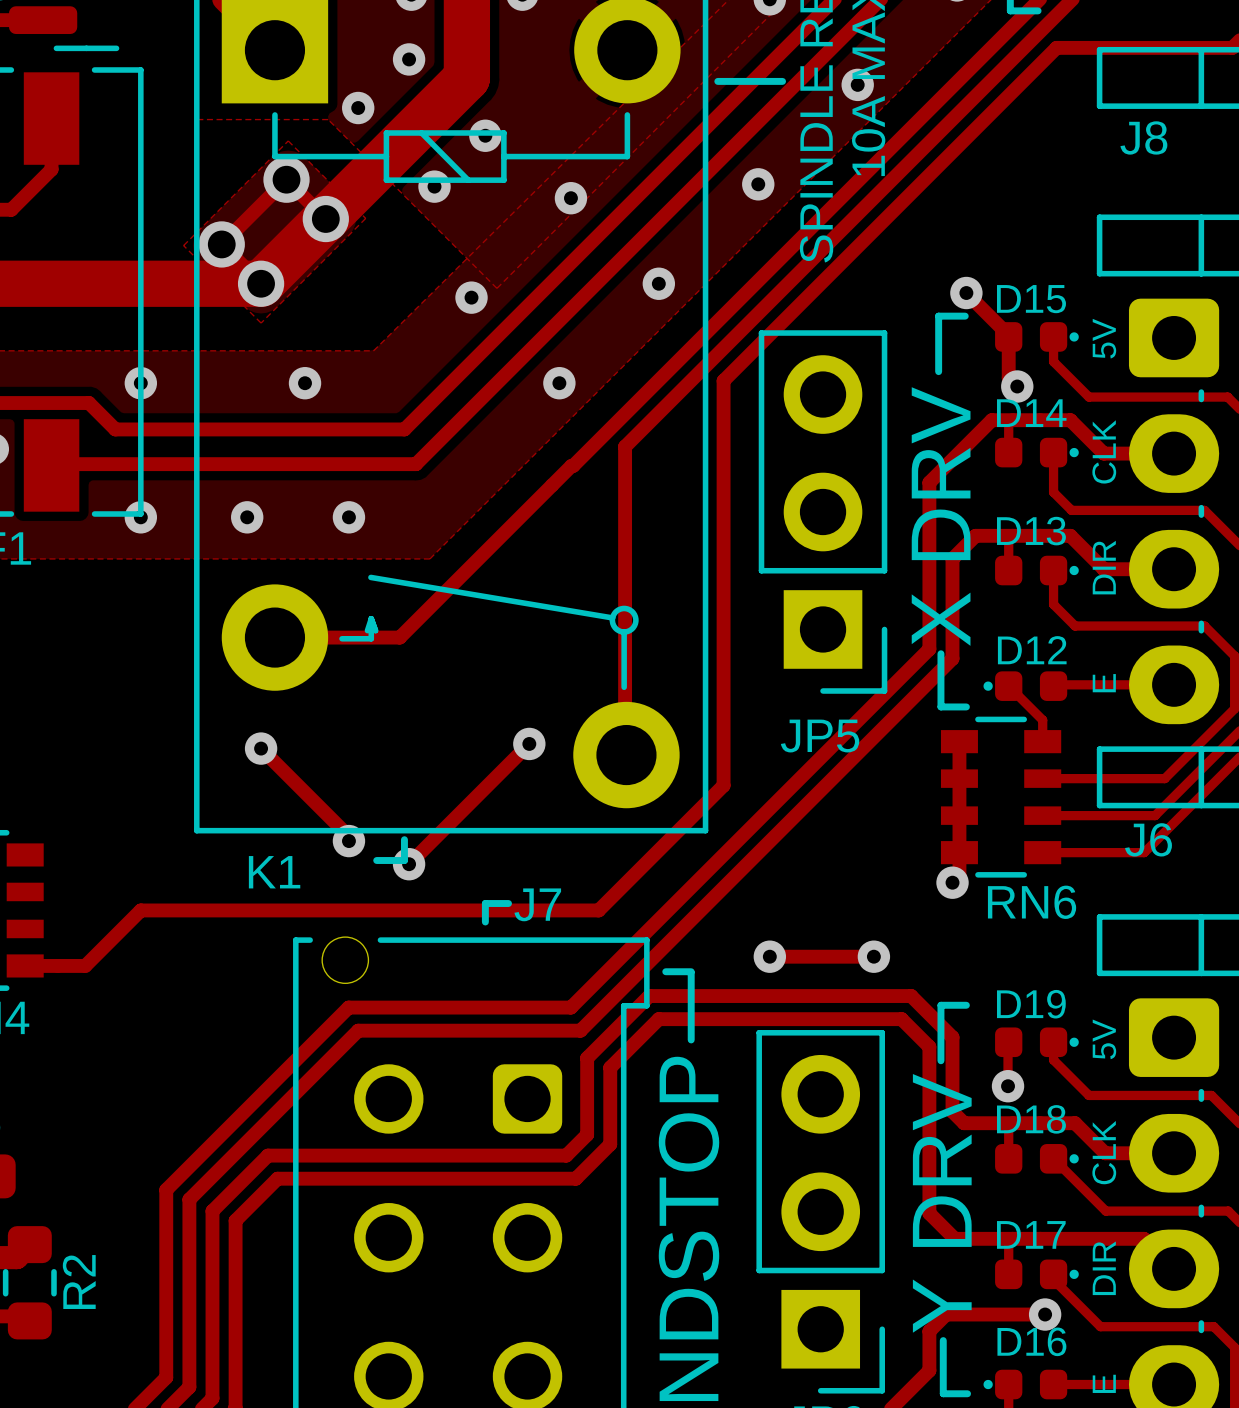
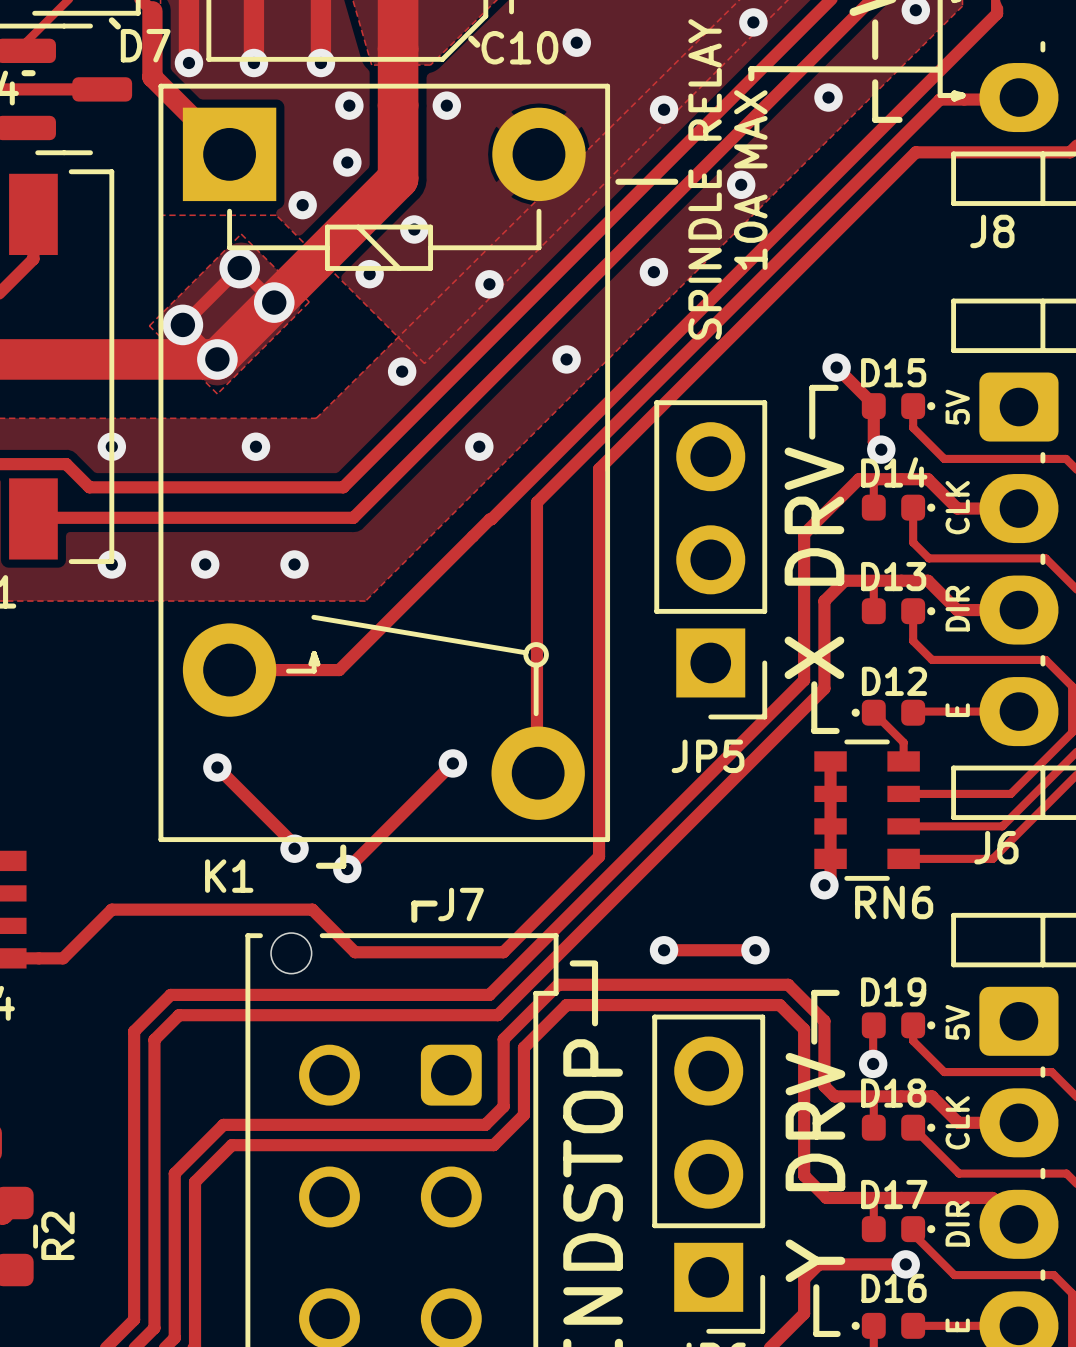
track: (723, 380) (723, 785) (598, 910) (369, 910) -> (623, 444) (599, 469) (599, 856) (503, 952) (355, 952) (312, 909)
track: (348, 1007) (166, 1189) -> (294, 994) (170, 994) (134, 1031) (134, 1155)
track: (358, 1030) (189, 1199) -> (302, 1015) (179, 1015) (154, 1039) (154, 1163)

